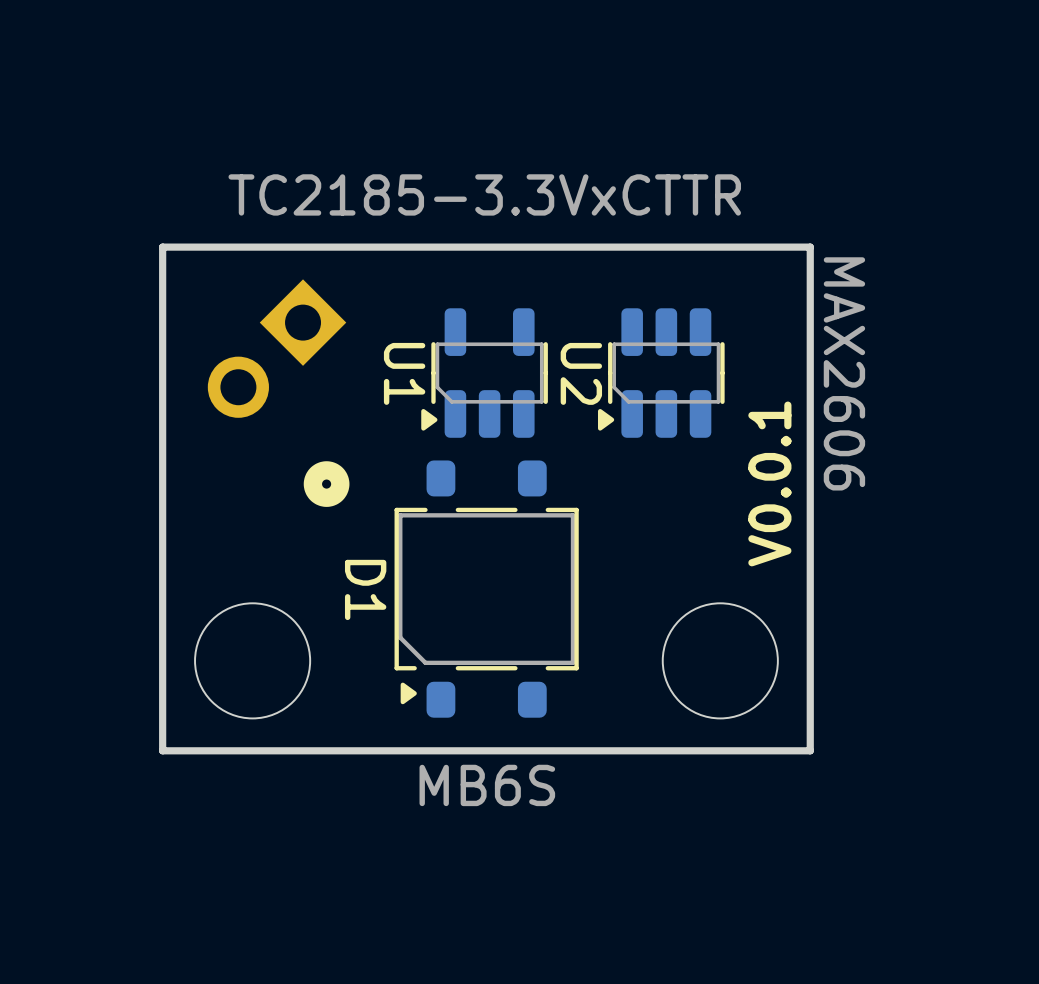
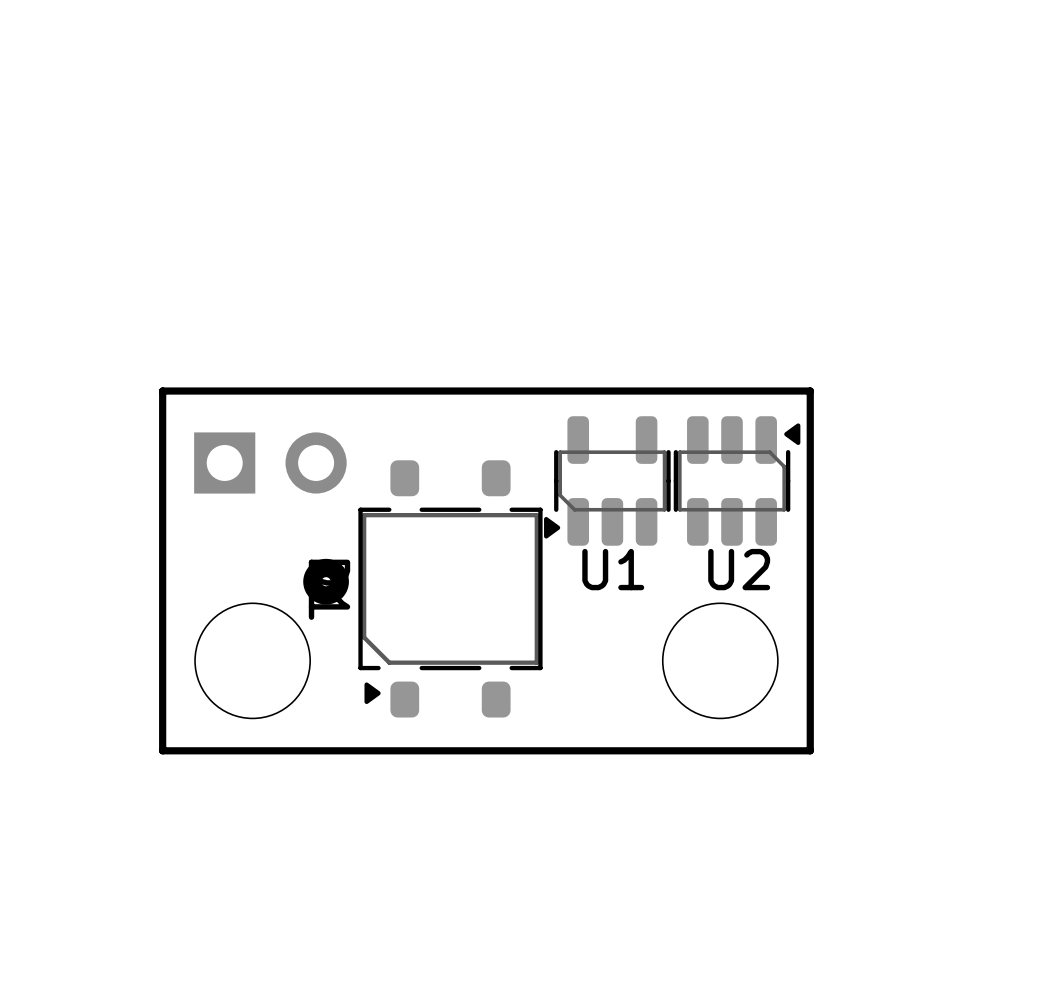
U1 value: TC2185-3.3VxCTTR (484, 194) -> none
part: (277, 348) -> none
U1 name rotation: 0° (404, 373) -> 90° counterclockwise (613, 569)
U1 name position: U1 (404, 373) -> U1 (613, 569)
U1 position: (484, 373) -> (607, 480)
U2 name position: U2 (581, 373) -> U2 (739, 569)
U2 rotation: 0° (661, 373) -> 180° (737, 480)
U2 position: (661, 373) -> (737, 480)
U2 value: MAX2606 (844, 373) -> none
board edge: (810, 391) (810, 247) (162, 247) (162, 391) -> (810, 391) (162, 391)
part: none -> (270, 462)
text: V0.0.1 (769, 483) -> none
part position: (326, 484) -> (326, 581)
D1 position: (486, 589) -> (450, 588)
D1 value: MB6S (487, 785) -> none

